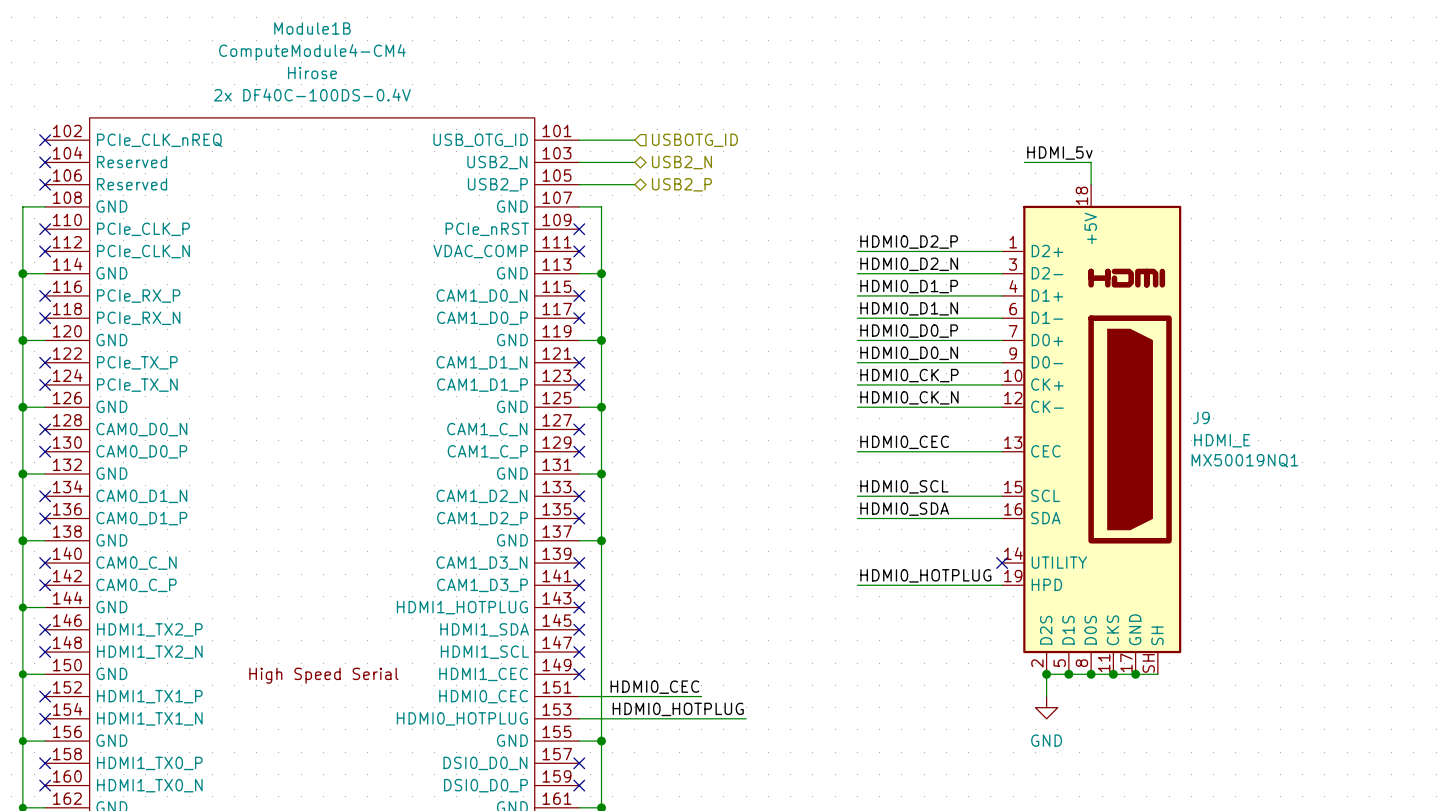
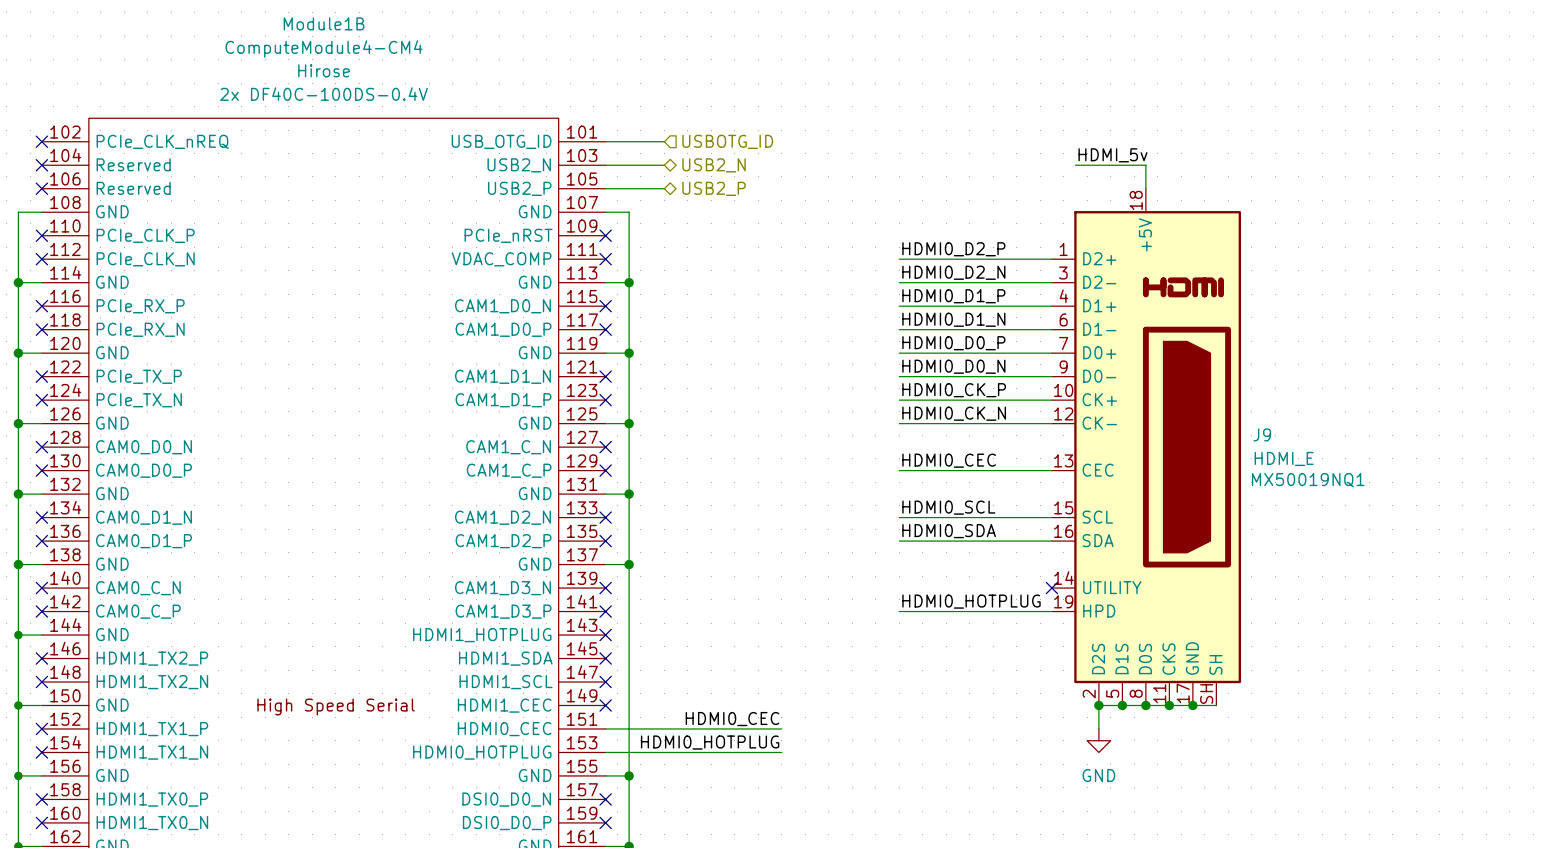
label position: HDMI0_CEC (654, 687) -> HDMI0_CEC (732, 719)
wire: none -> (734, 728) (781, 728)

